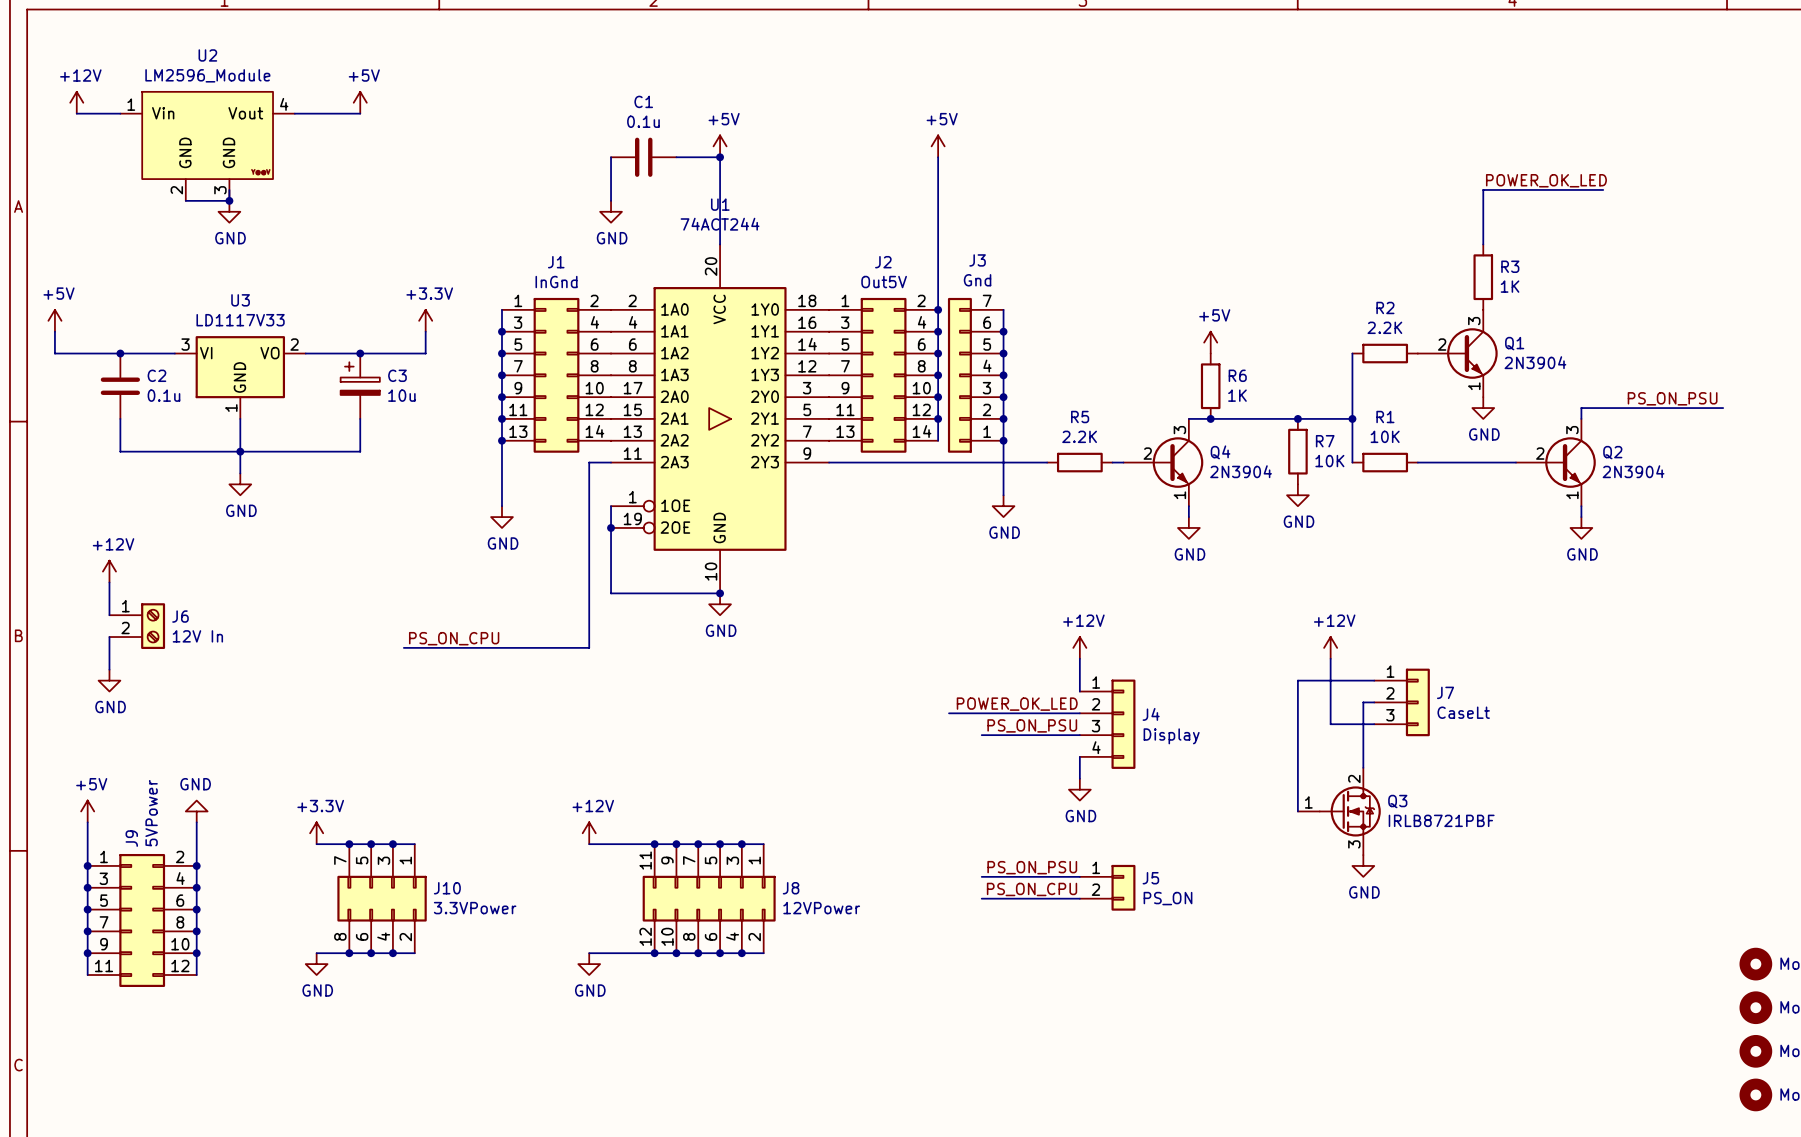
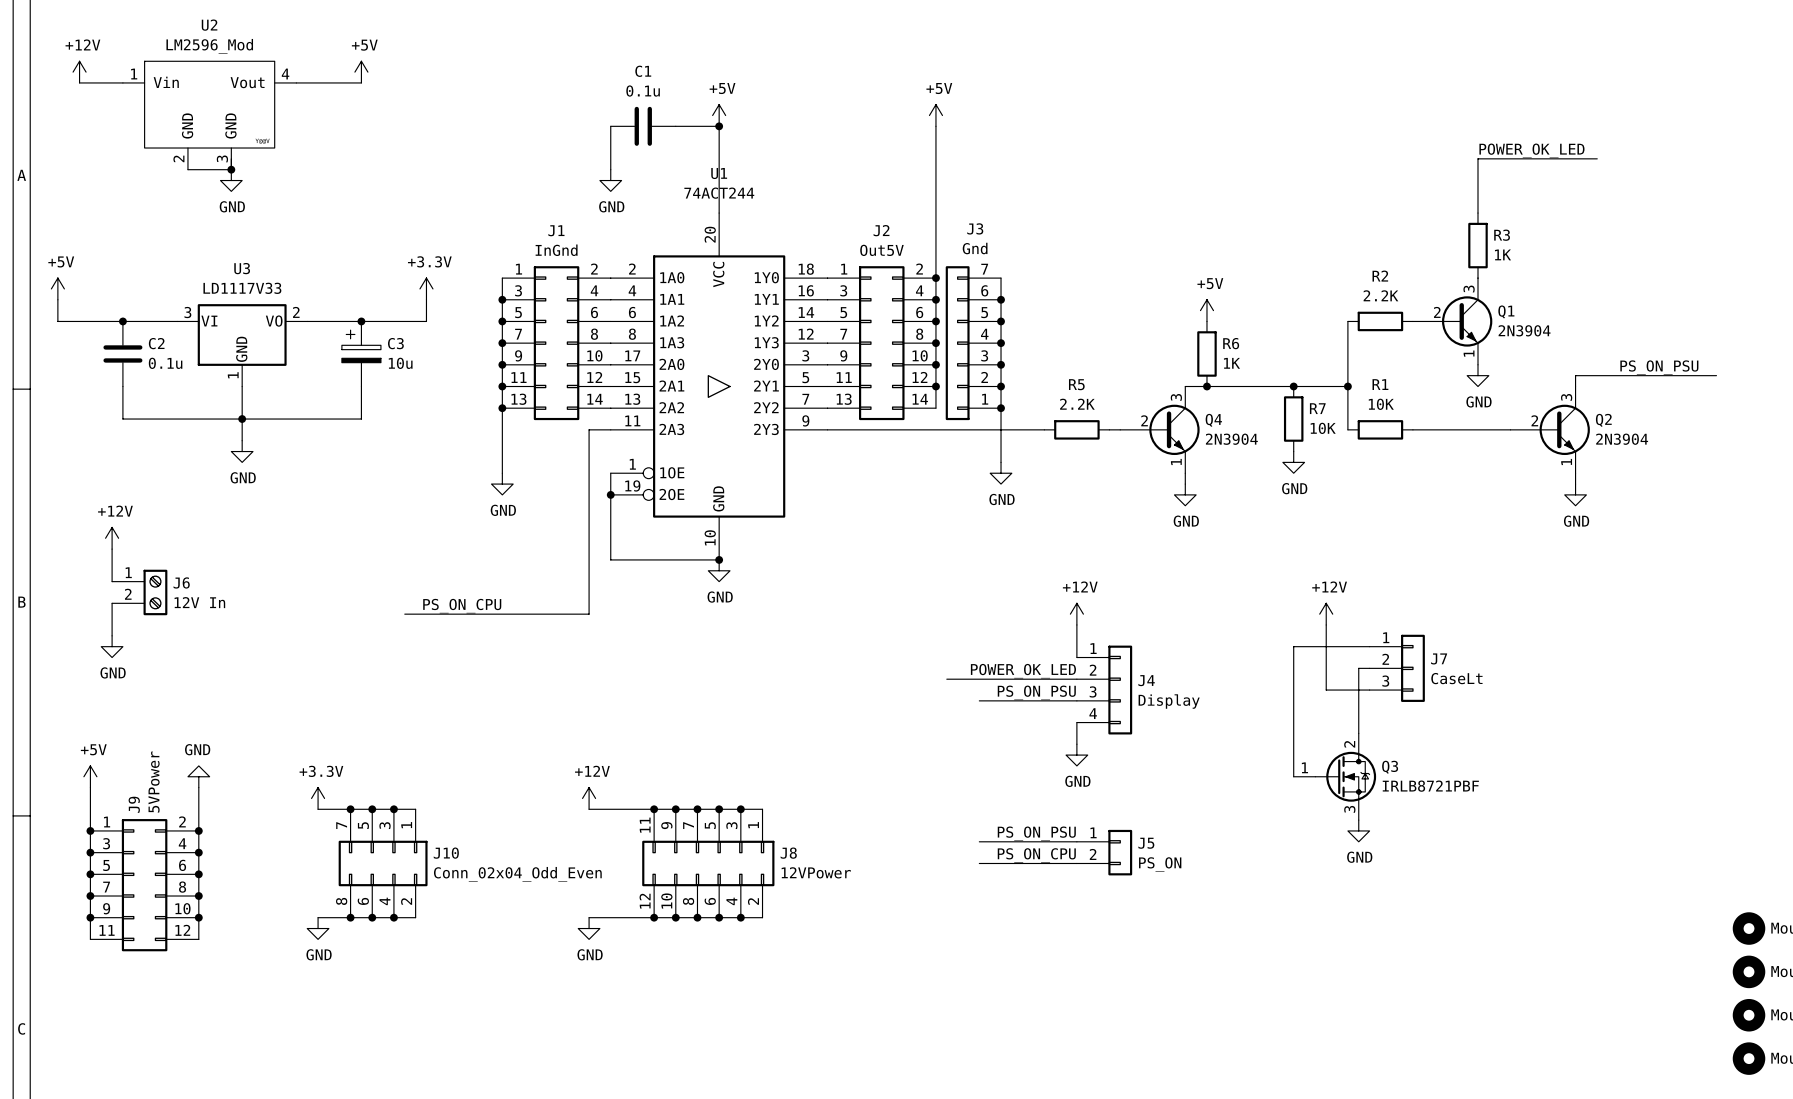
U2 value: LM2596_Module (207, 75) -> LM2596_Mod (209, 46)
J10 value: 3.3VPower (475, 908) -> Conn_02x04_Odd_Even (517, 874)

